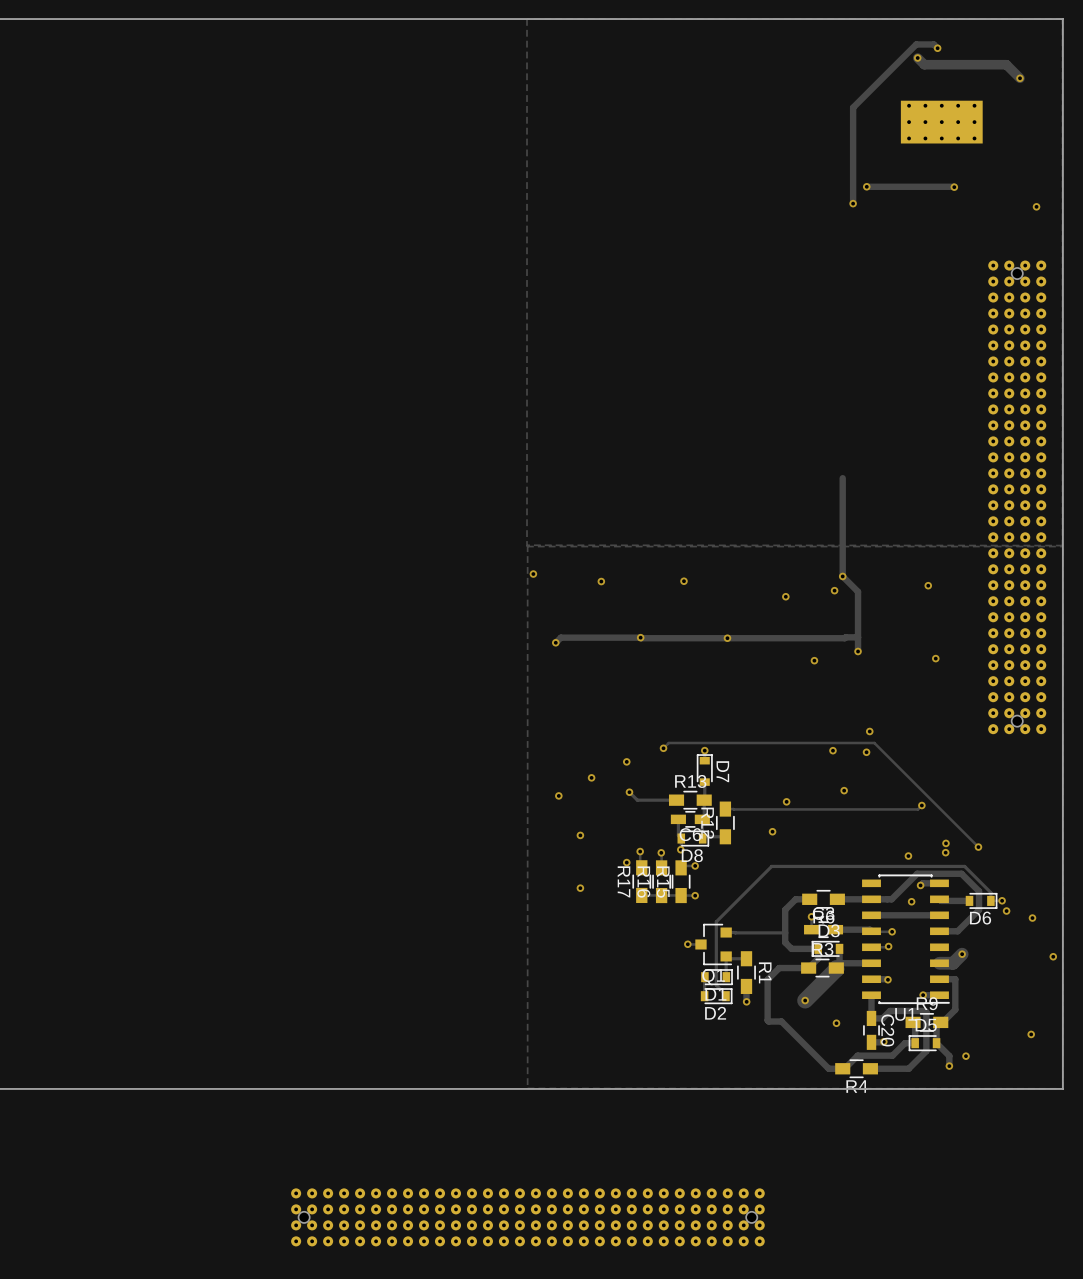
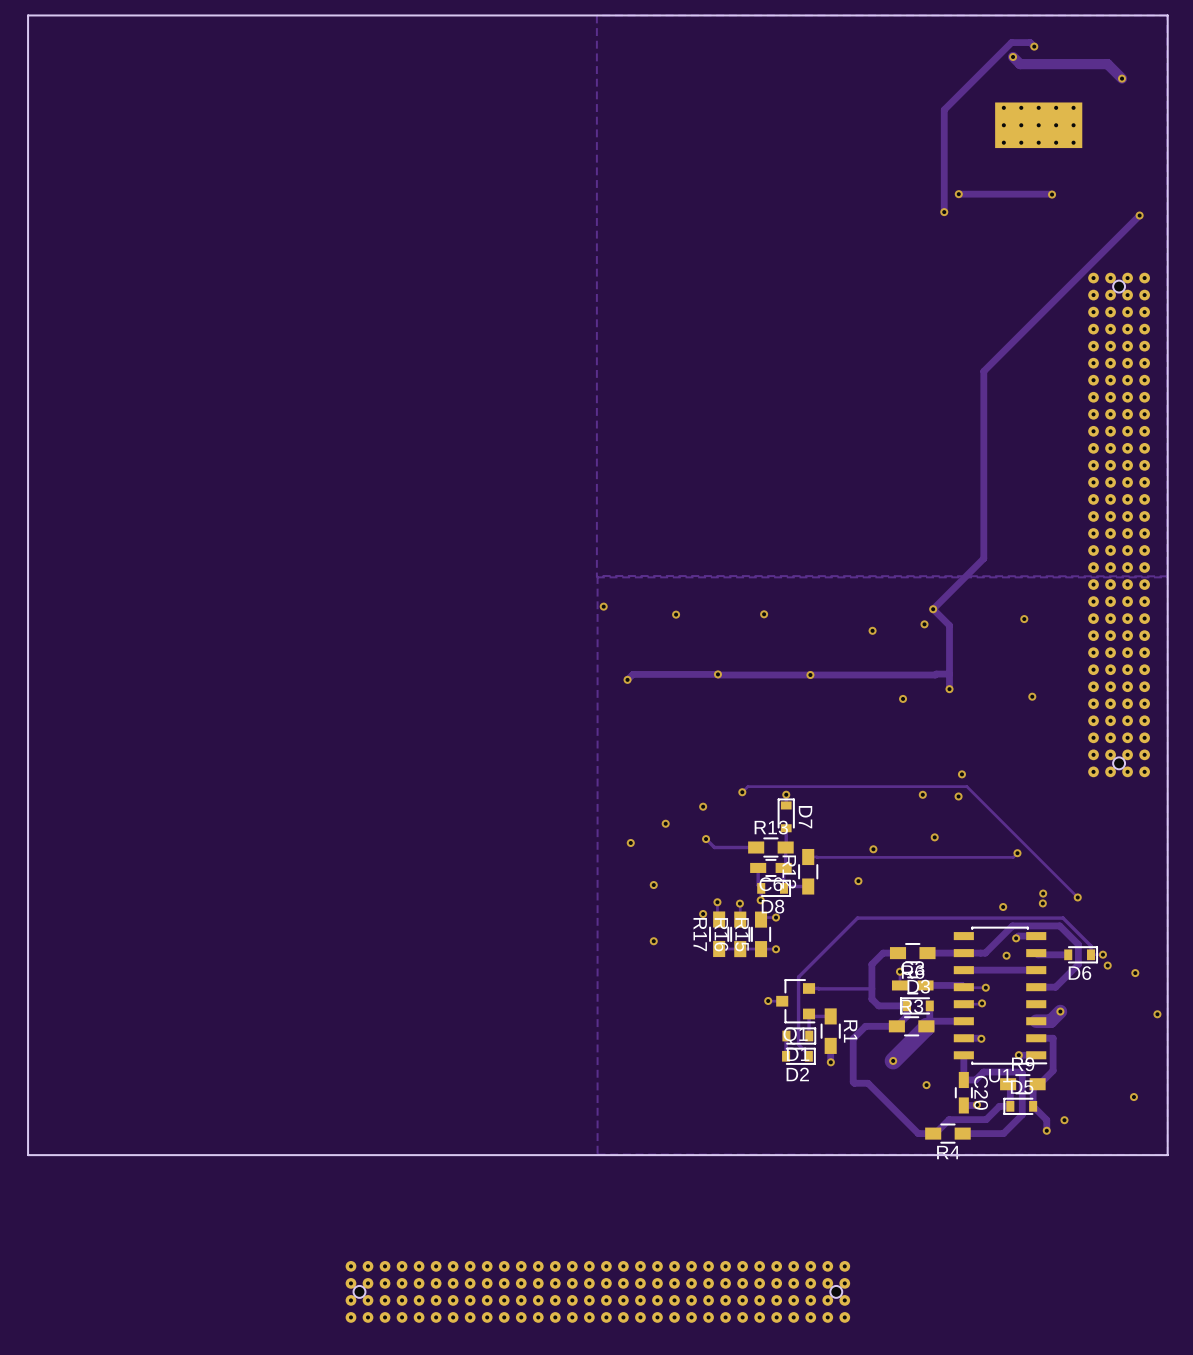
track: (842, 478) (842, 576) -> (1139, 215) (983, 371) (983, 558) (933, 609)

